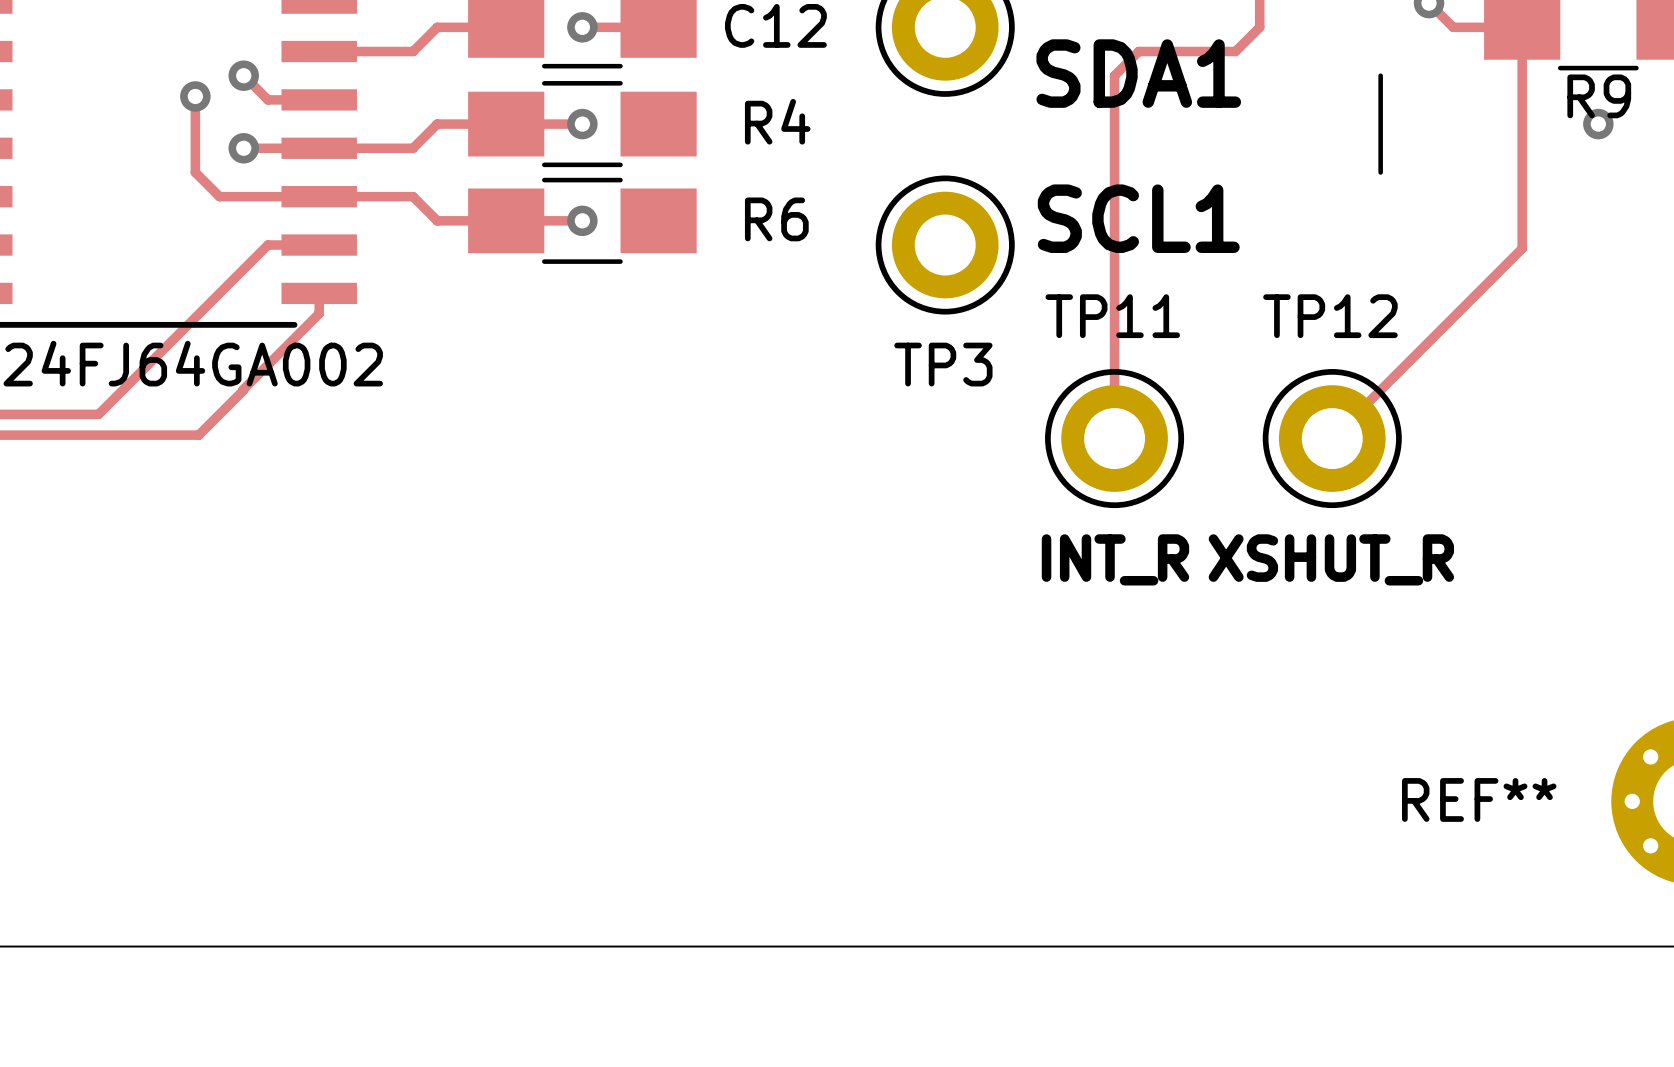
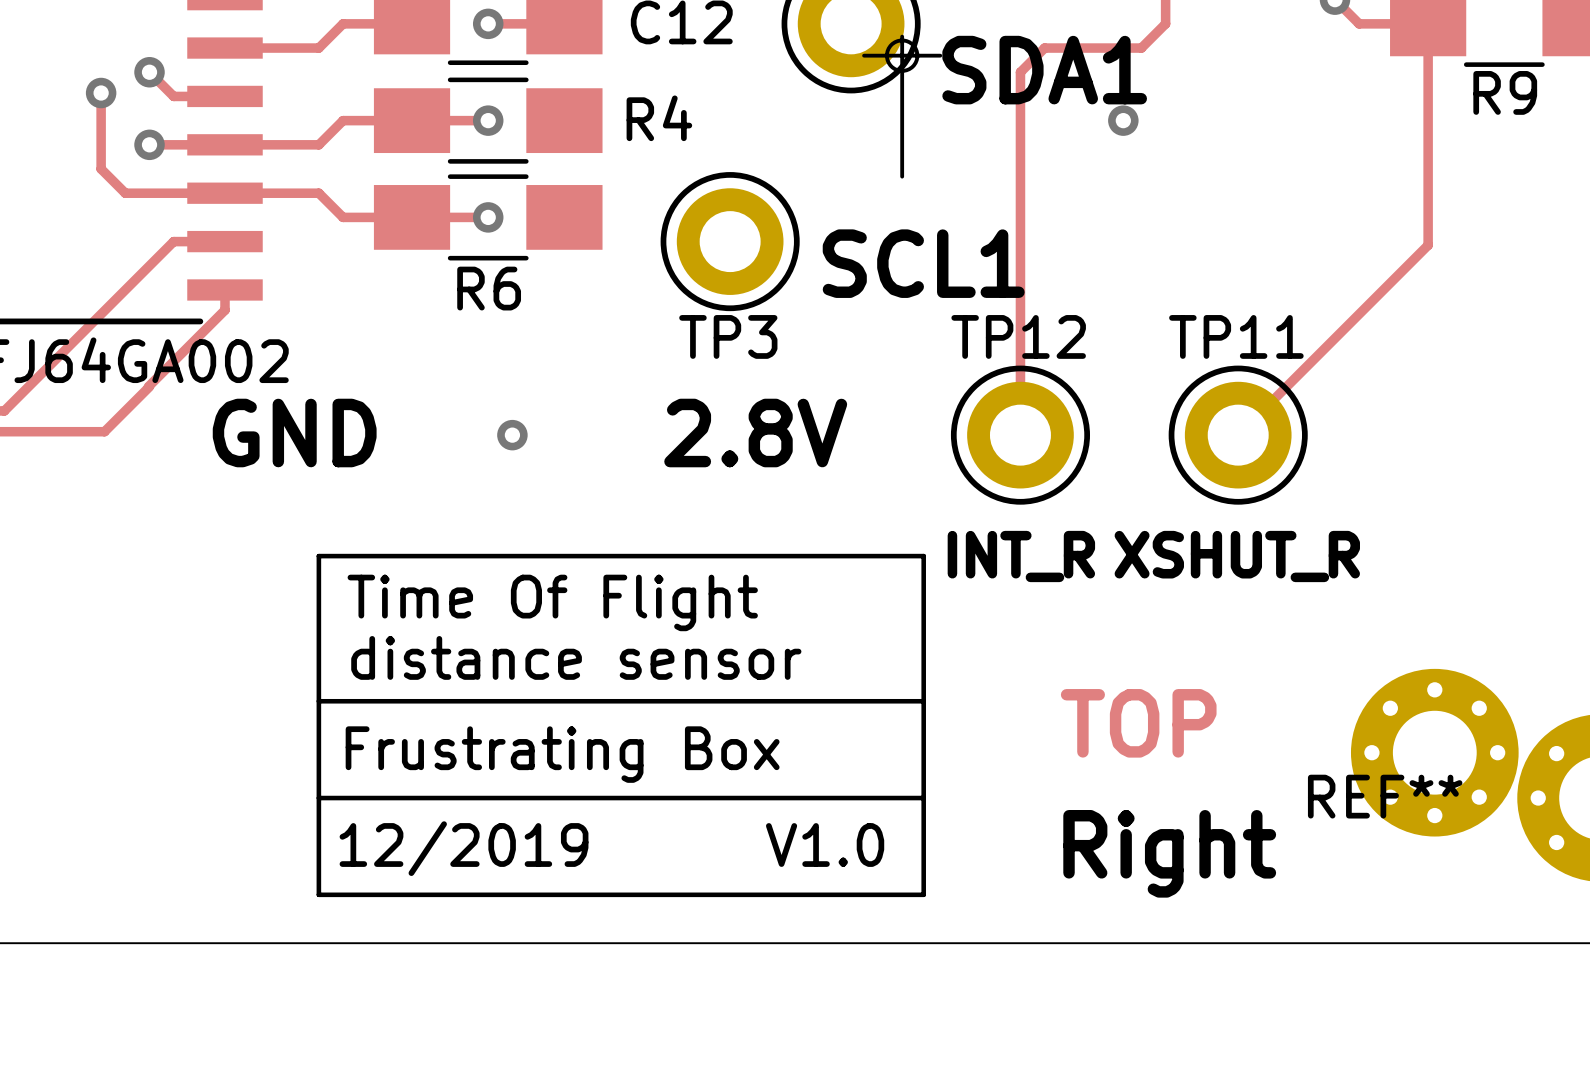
line: (1380, 75) (1380, 172) -> none
part: none -> (902, 106)
R4 name position: R4 (777, 121) -> R4 (659, 118)
via: none -> (1123, 120)
via: (1598, 124) -> none
text position: SCL1 (1138, 218) -> SCL1 (923, 263)
R6 name position: R6 (776, 219) -> R6 (489, 288)
TP3 position: (945, 245) -> (730, 241)
TP11 name: TP11 (1112, 316) -> TP12 (1018, 336)
TP12 name: TP12 (1330, 316) -> TP11 (1236, 336)
TP3 name position: TP3 (943, 364) -> TP3 (728, 336)
text: none -> GND (294, 433)
text: none -> 2.8V (755, 433)
via: none -> (512, 435)
line: none -> (318, 556) (318, 894) (923, 894) (923, 556) (318, 556)
text: none -> Time Of Flight (552, 602)
text: none -> distance sensor (576, 657)
line: none -> (318, 701) (923, 701)
text: none -> TOP (1138, 723)
part: none -> (1434, 752)
text: none -> Frustrating Box (562, 754)
line: none -> (318, 798) (923, 798)
text: none -> V1.0 (825, 845)
text: none -> 12/2019 (464, 848)
text: none -> Right (1169, 853)

